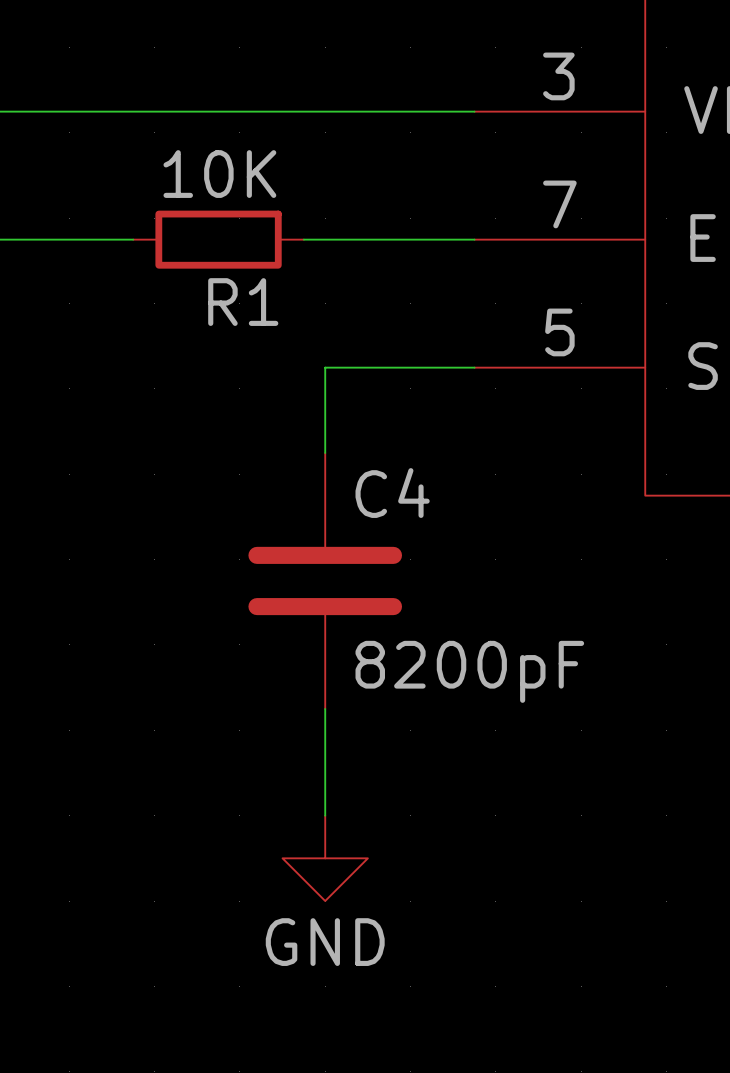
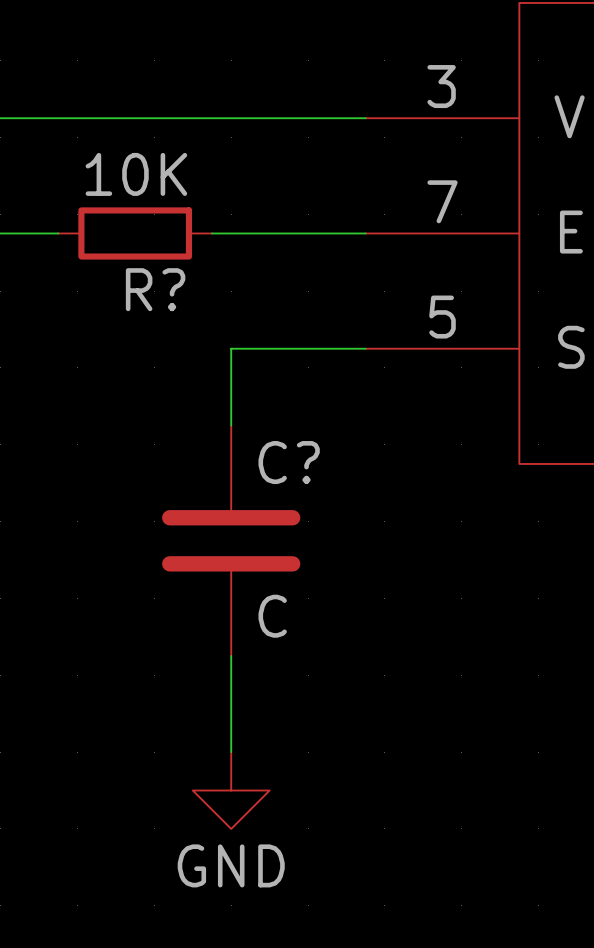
R1 name: R1 (243, 302) -> R? (155, 289)
C4 name: C4 (392, 493) -> C? (289, 462)
C4 value: 8200pF (469, 671) -> C (272, 616)

